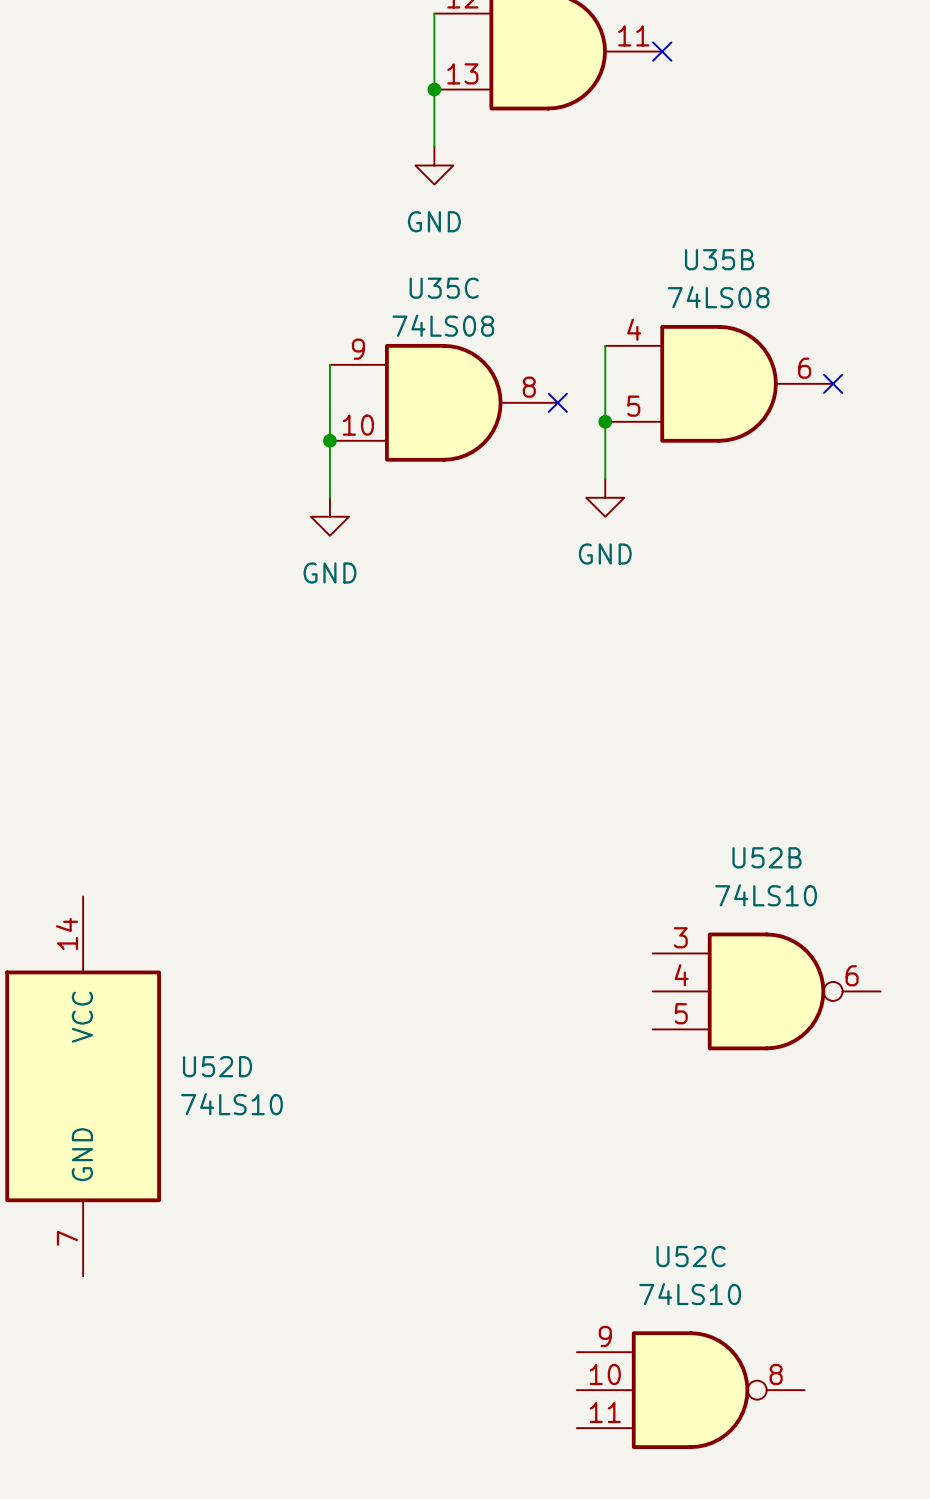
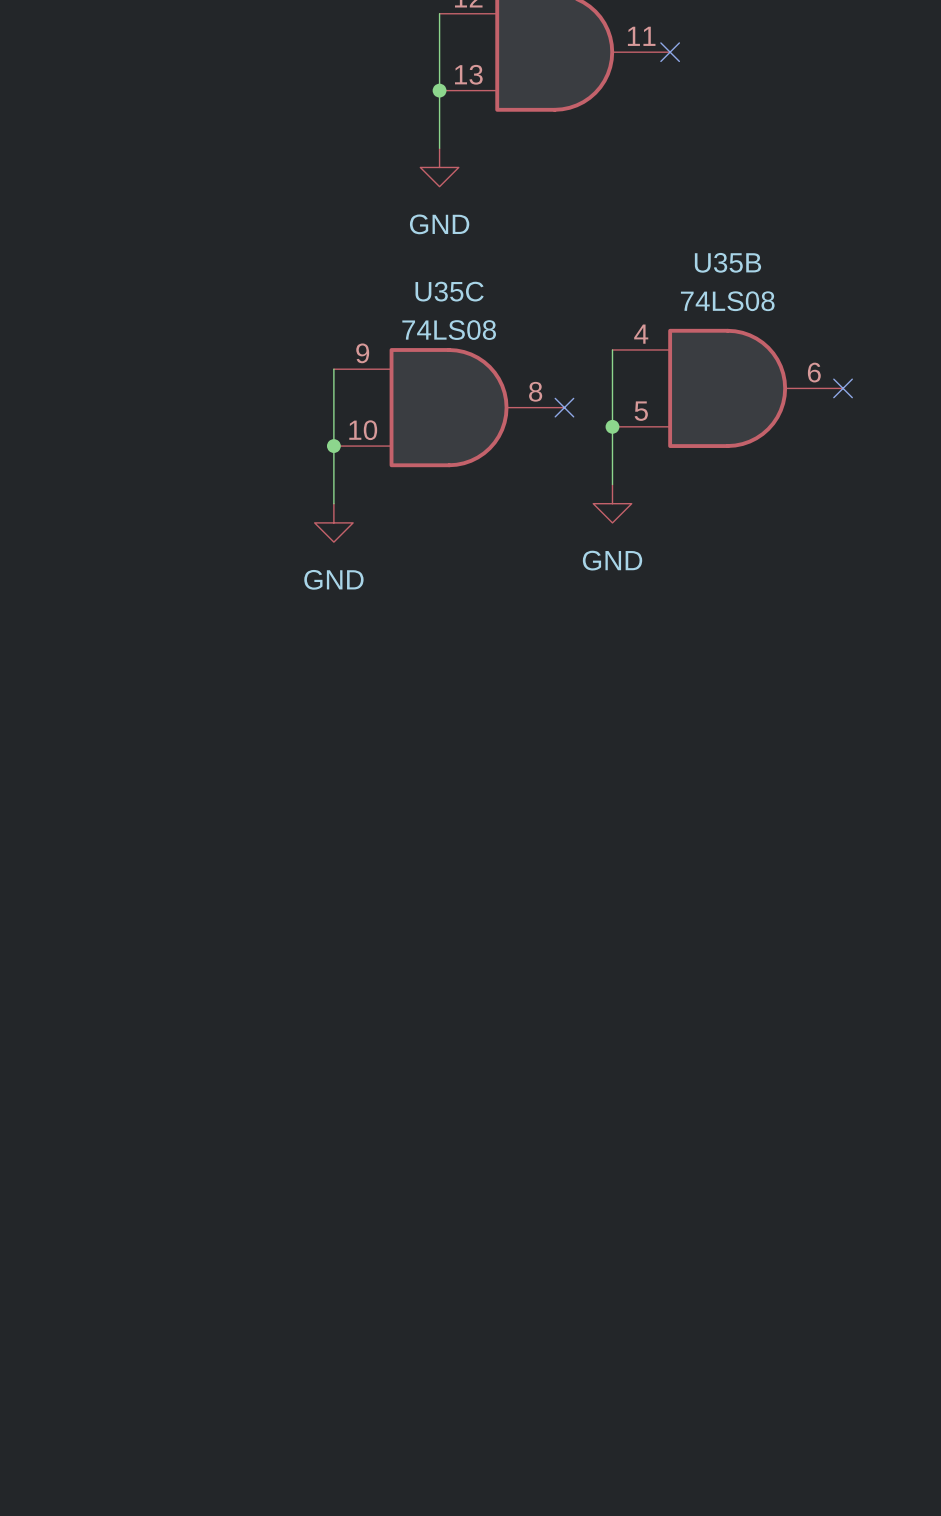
U52B: 74LS10 (766, 991) -> none
U52D: 74LS10 (83, 1086) -> none
U52C: 74LS10 (690, 1390) -> none

